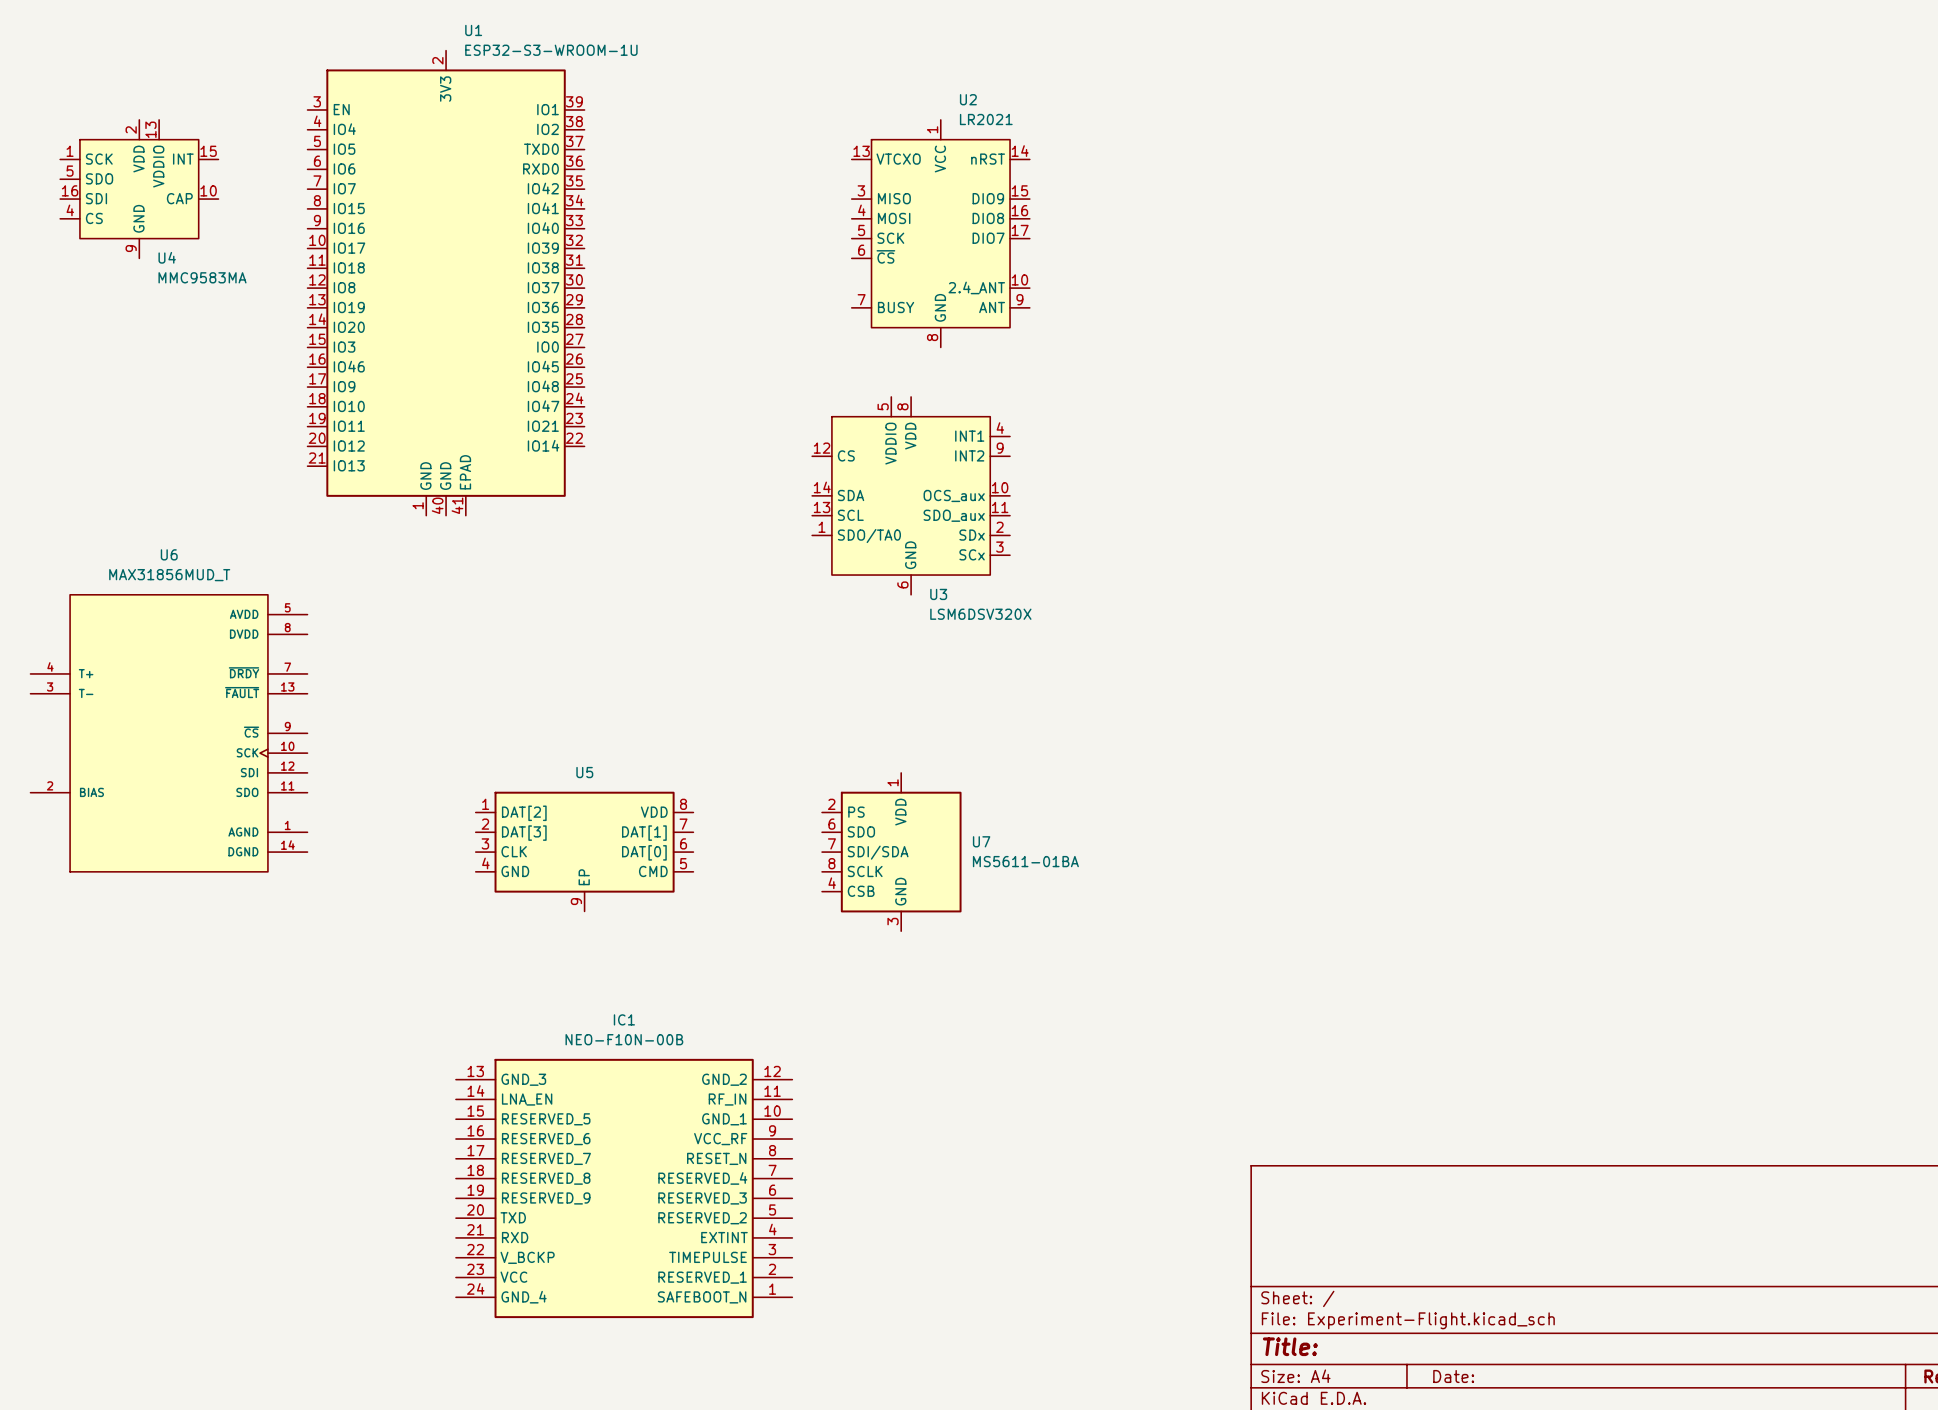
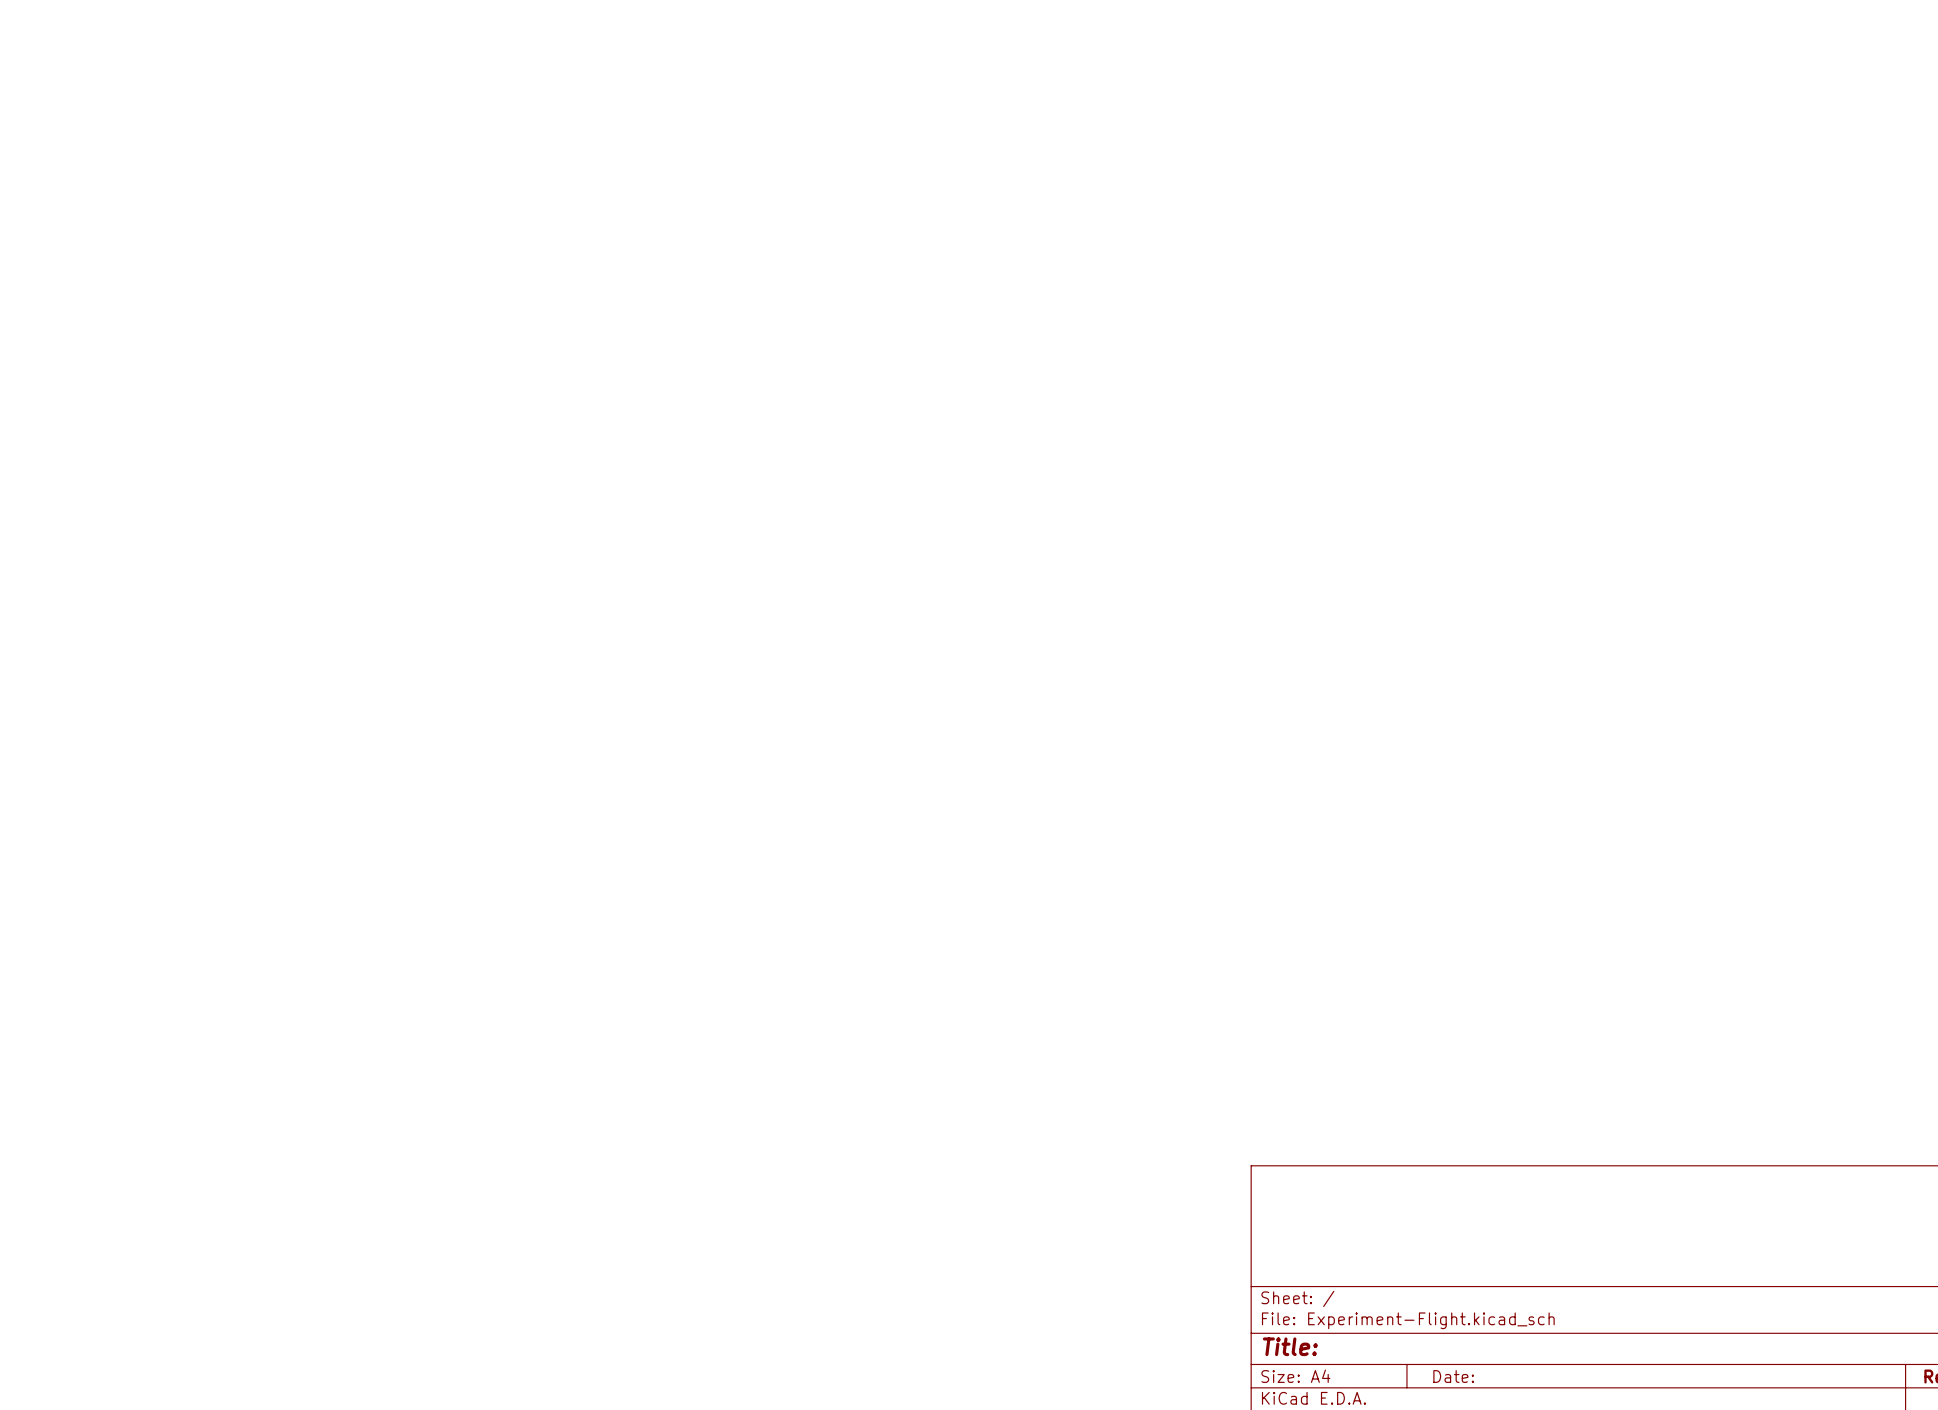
U4: MMC9583MA (139, 189) -> none
U2: LR2021 (940, 233) -> none
U1: ESP32-S3-WROOM-1U (446, 283) -> none
U3: LSM6DSV320X (911, 495) -> none
U6: MAX31856MUD_T (169, 733) -> none
U5: (584, 851) -> none
U7: MS5611-01BA (891, 852) -> none
IC1: NEO-F10N-00B (624, 1188) -> none

